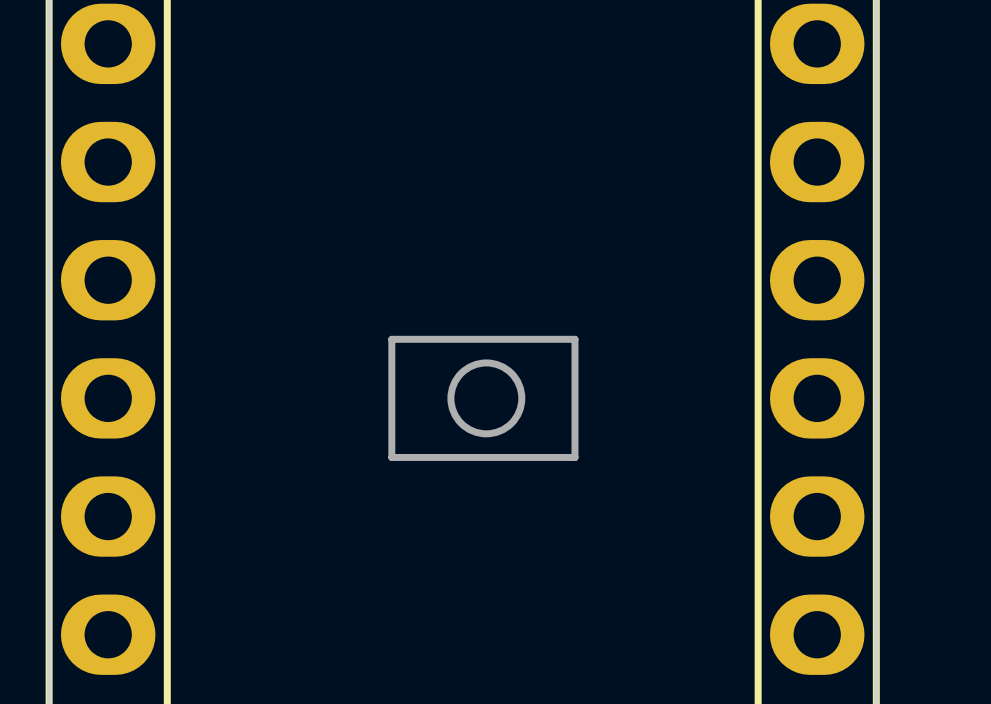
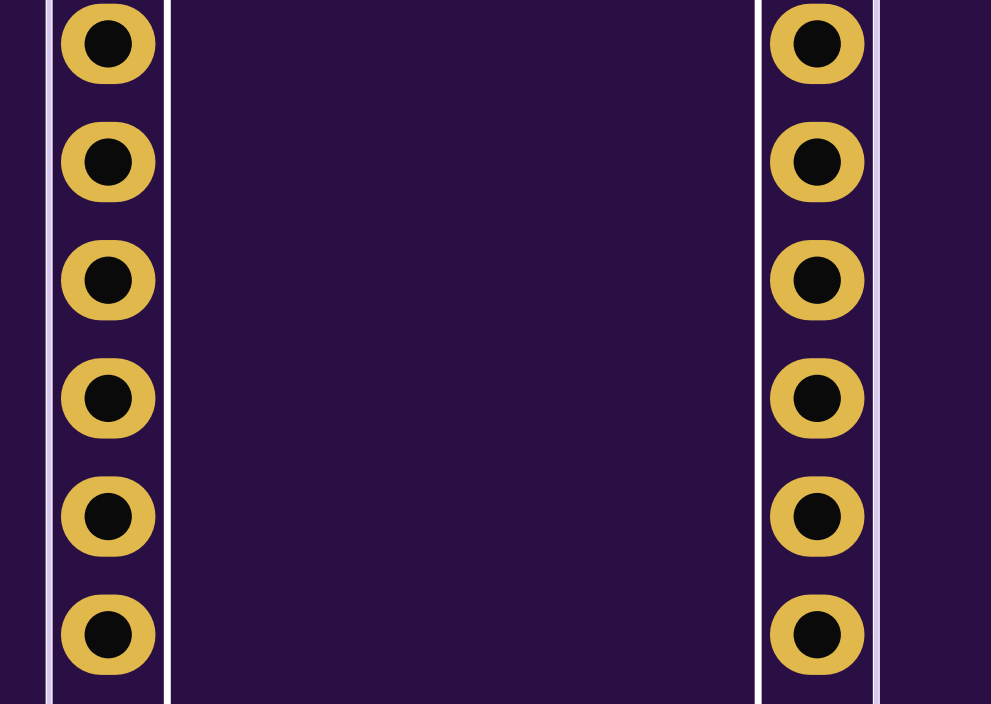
line: (391, 339) (391, 457) (574, 457) (574, 339) (391, 339) -> none
drawing: [447, 359, 526, 438] -> none

